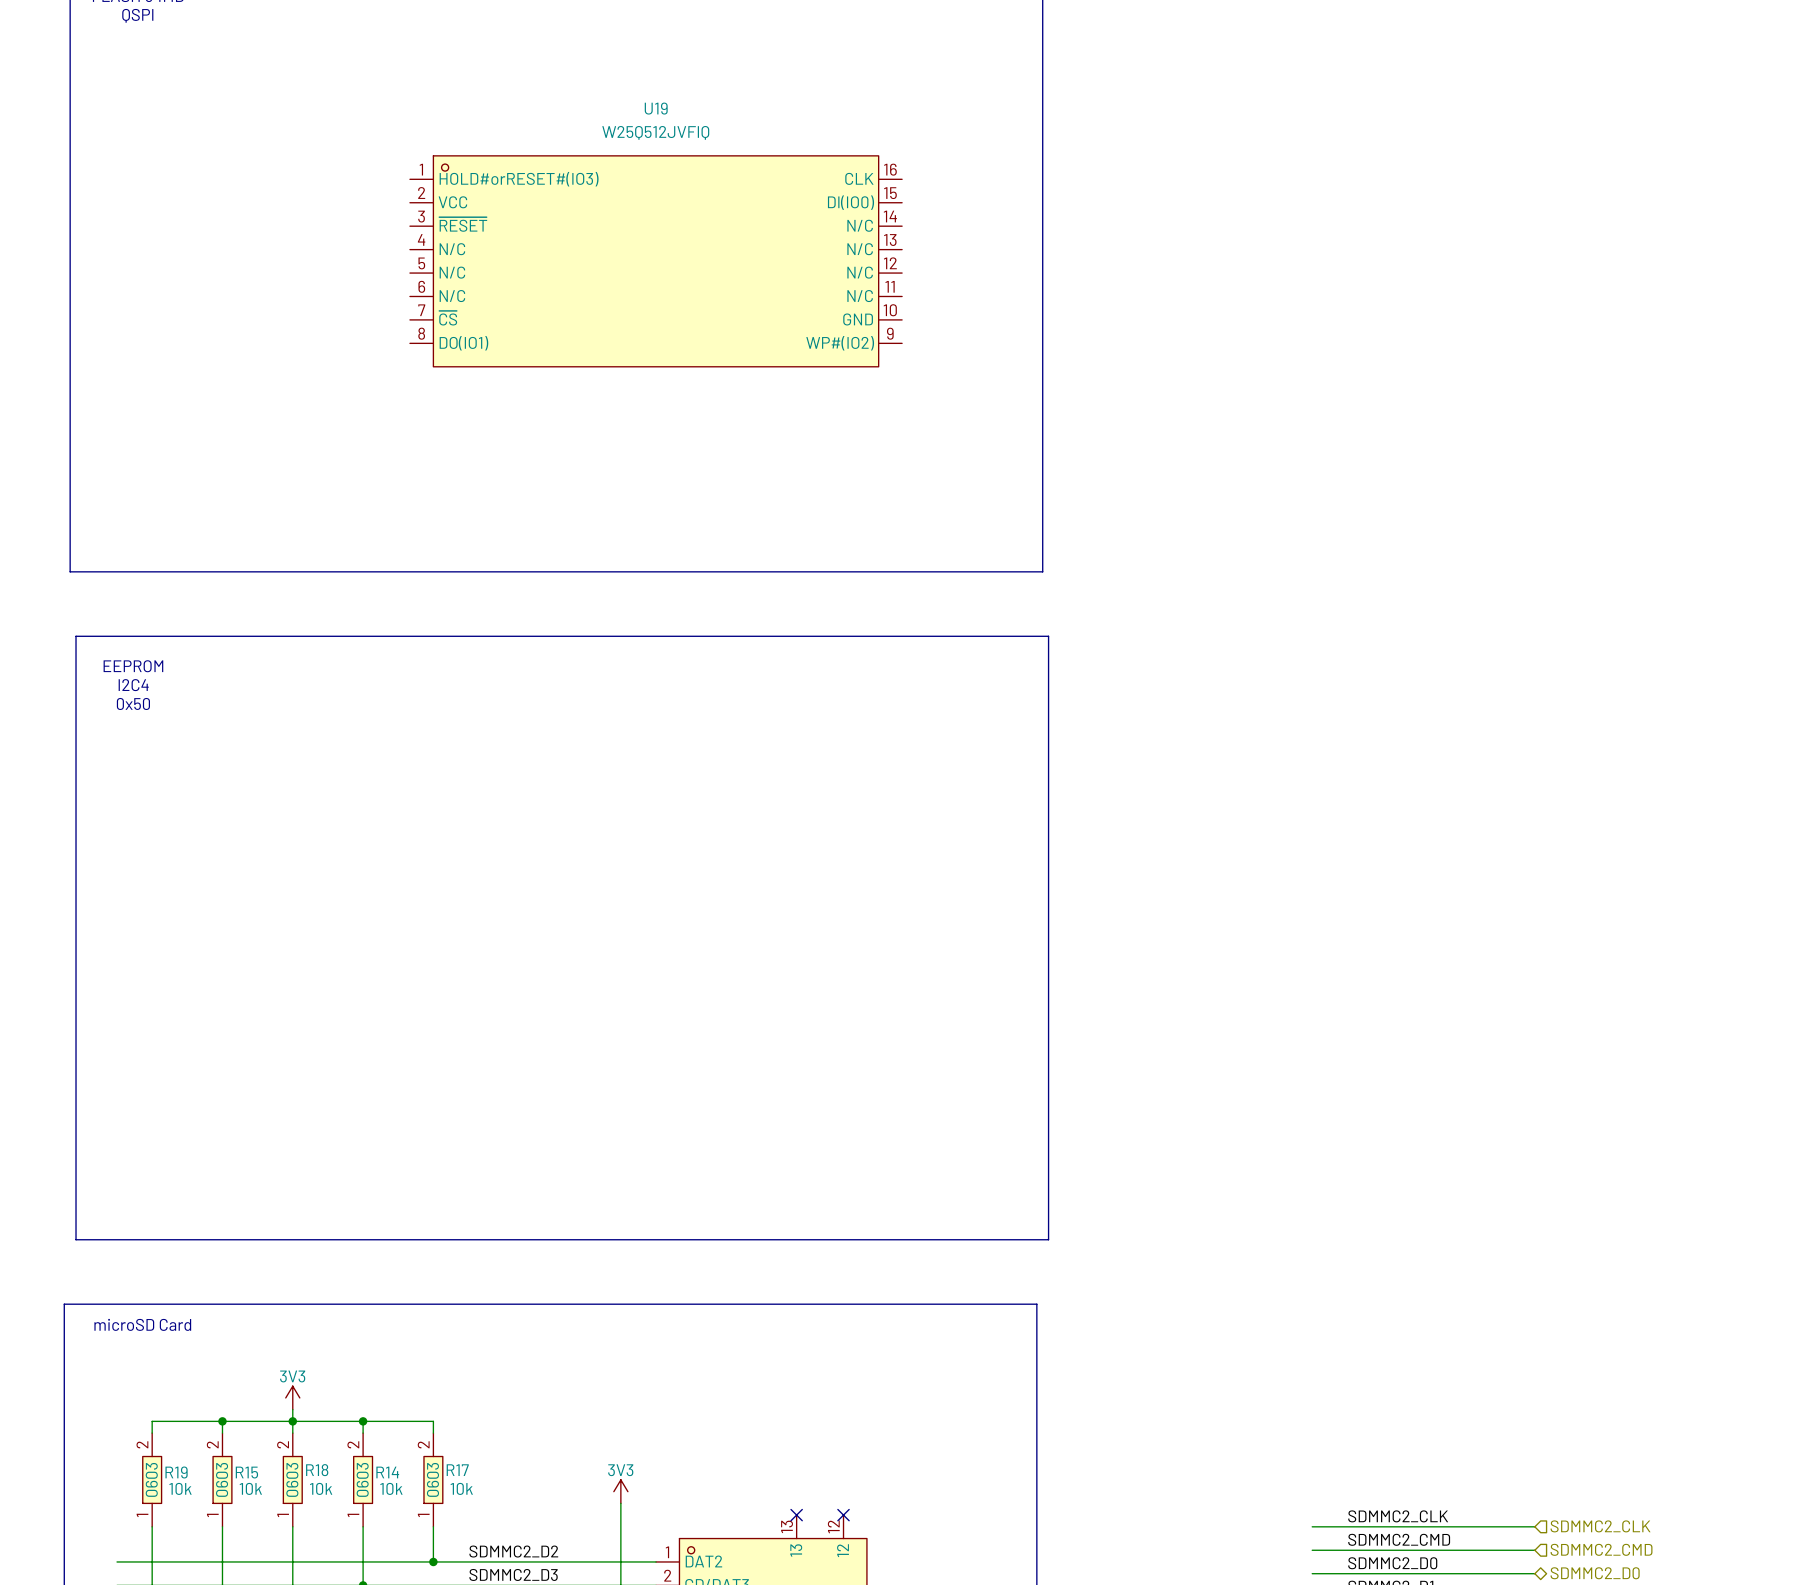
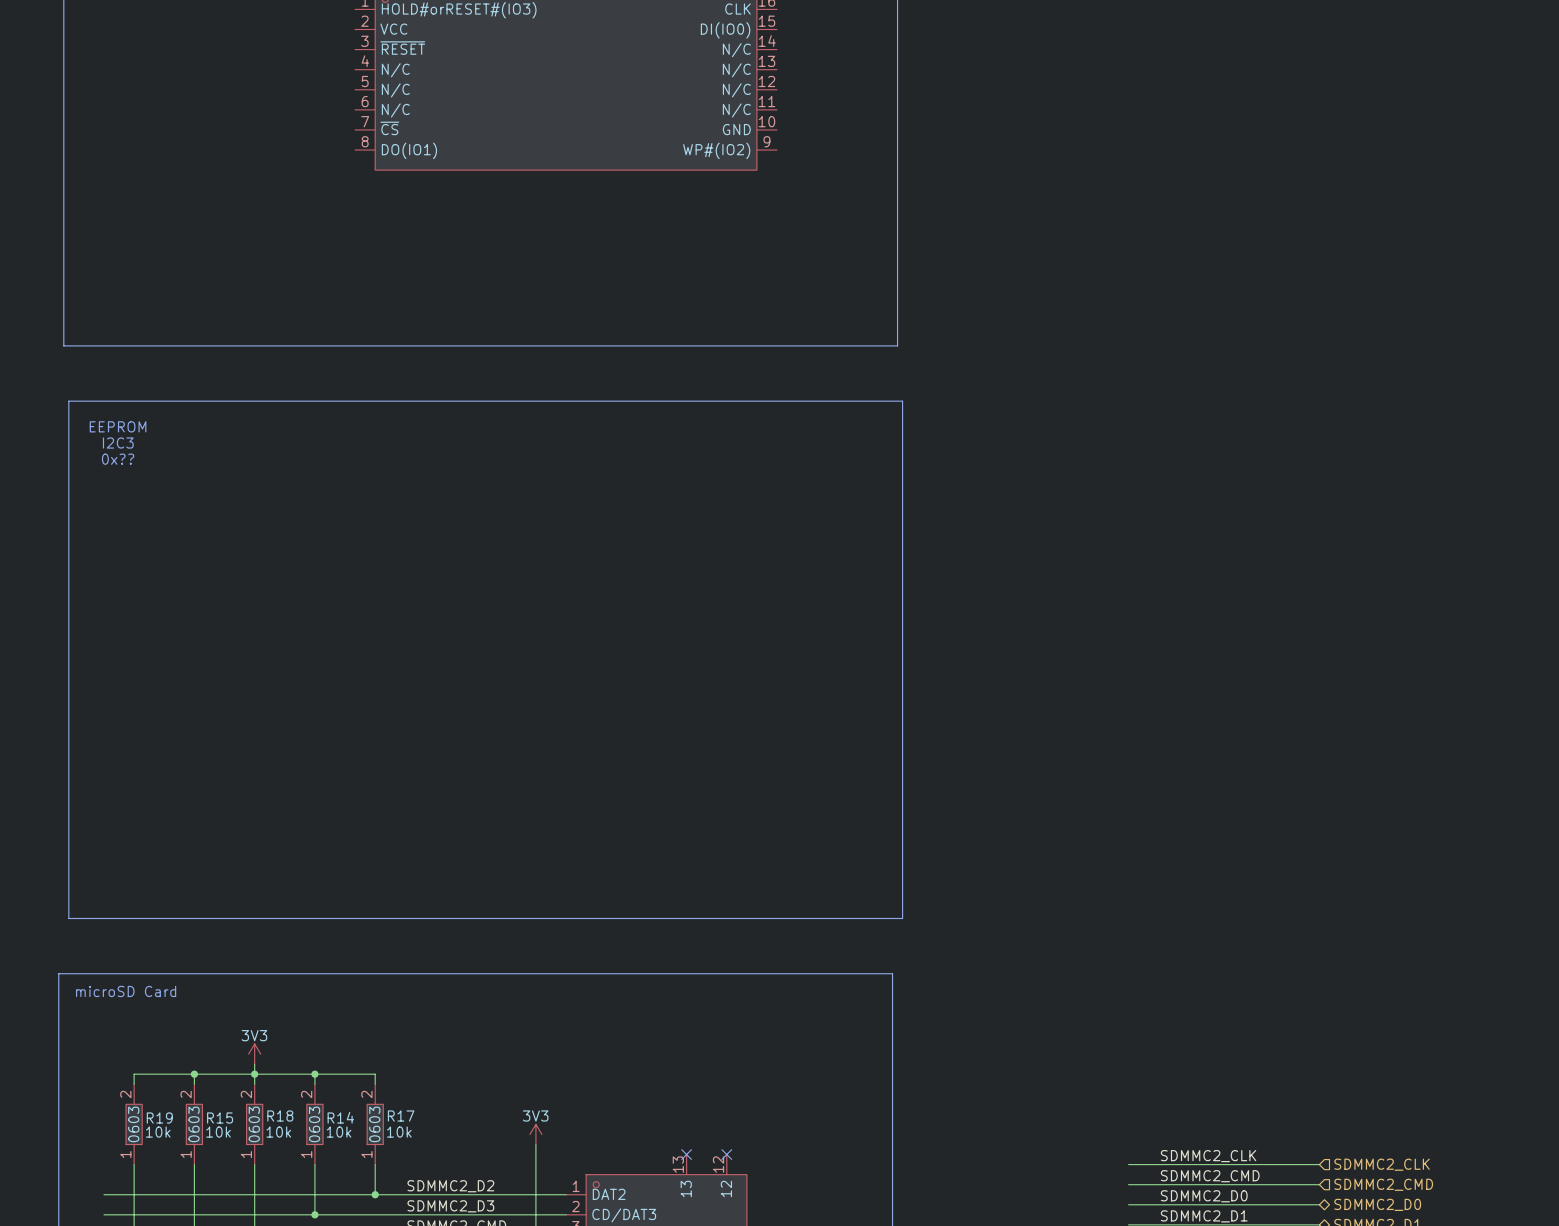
text: I2C4 (133, 685) -> I2C3 (118, 443)
text: 0x50 (133, 703) -> 0x?? (118, 459)

